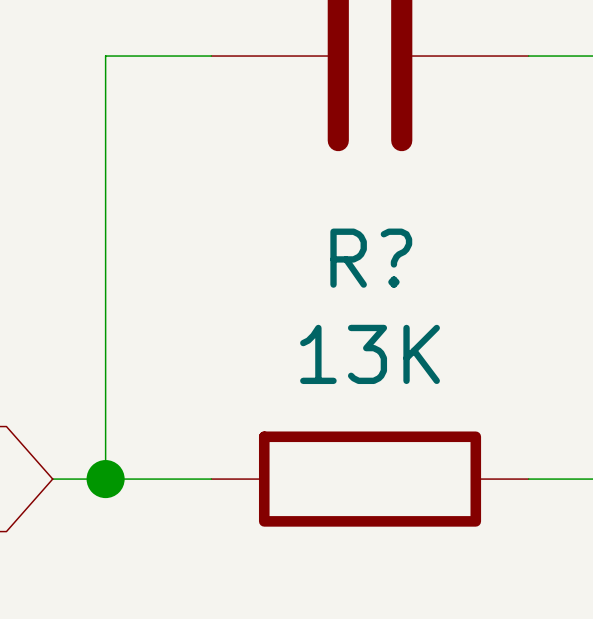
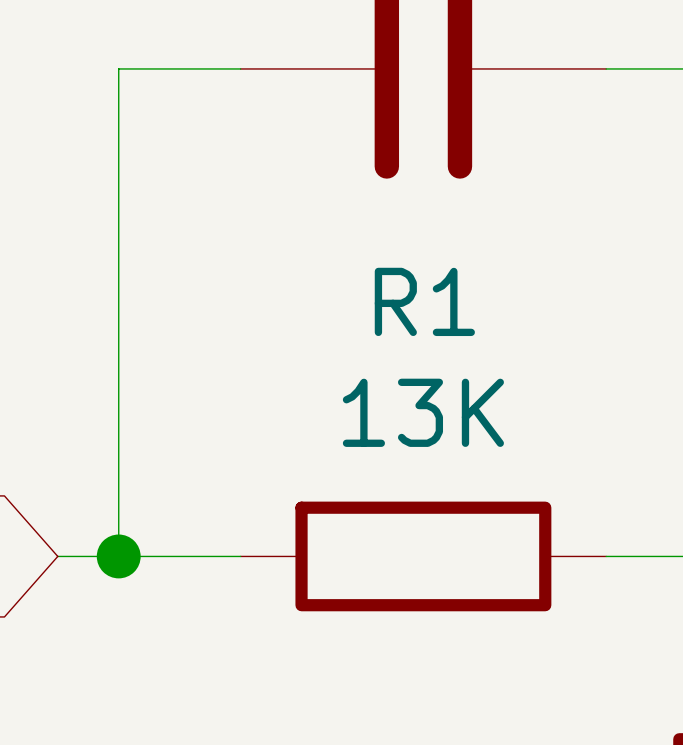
R? name: R? (371, 258) -> R1 (424, 301)

